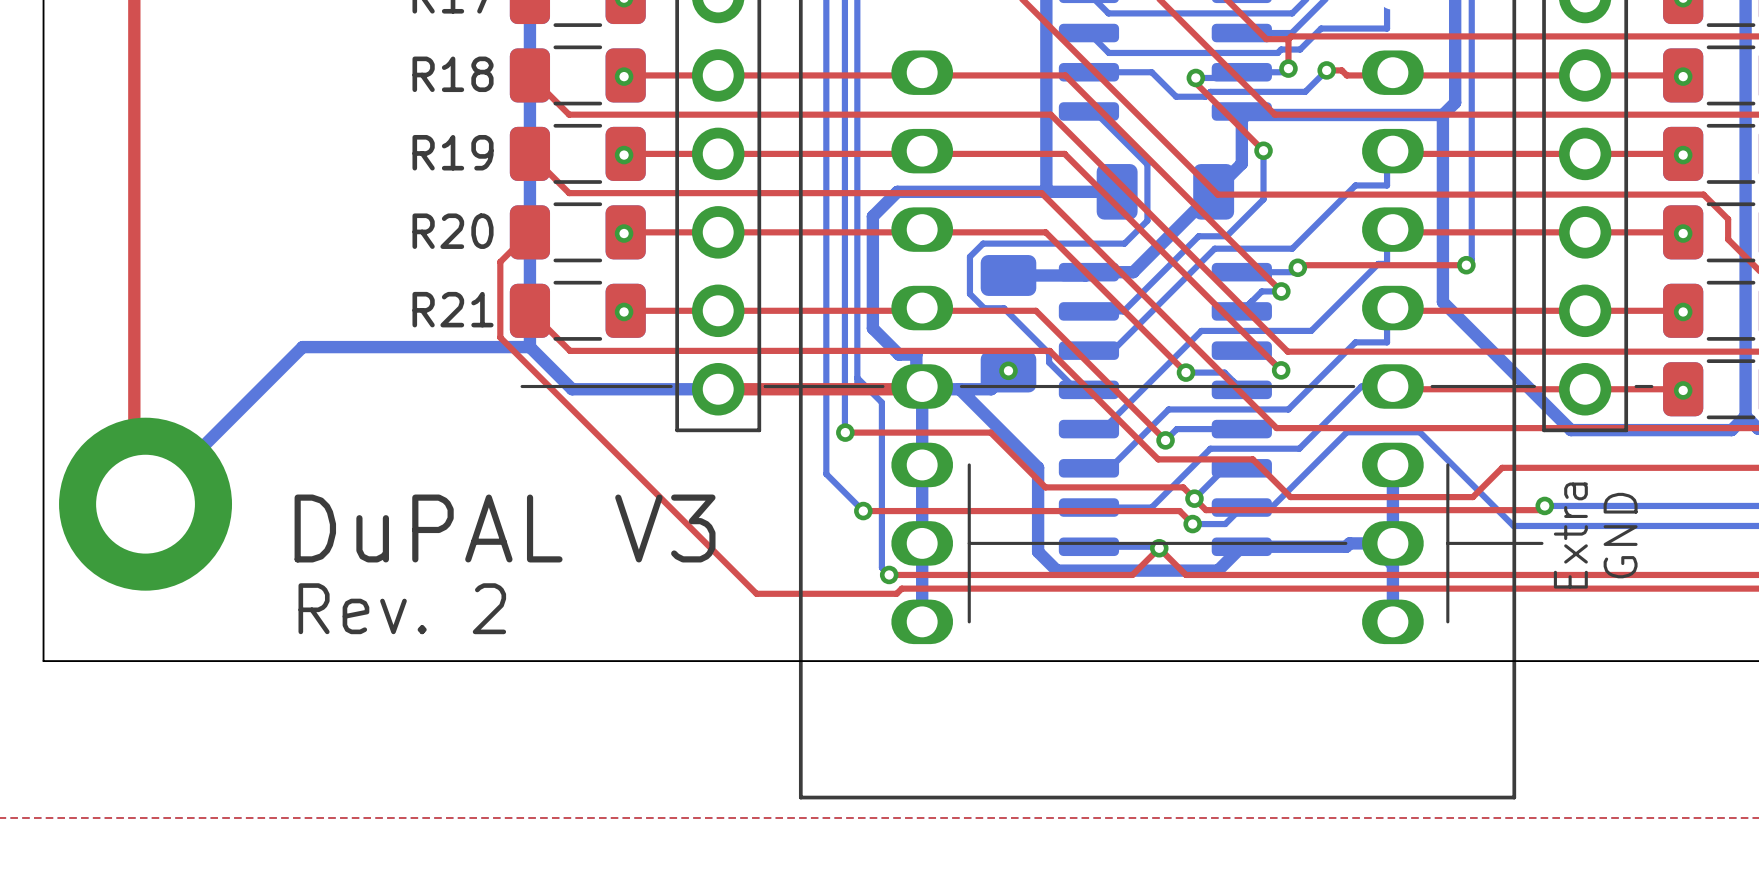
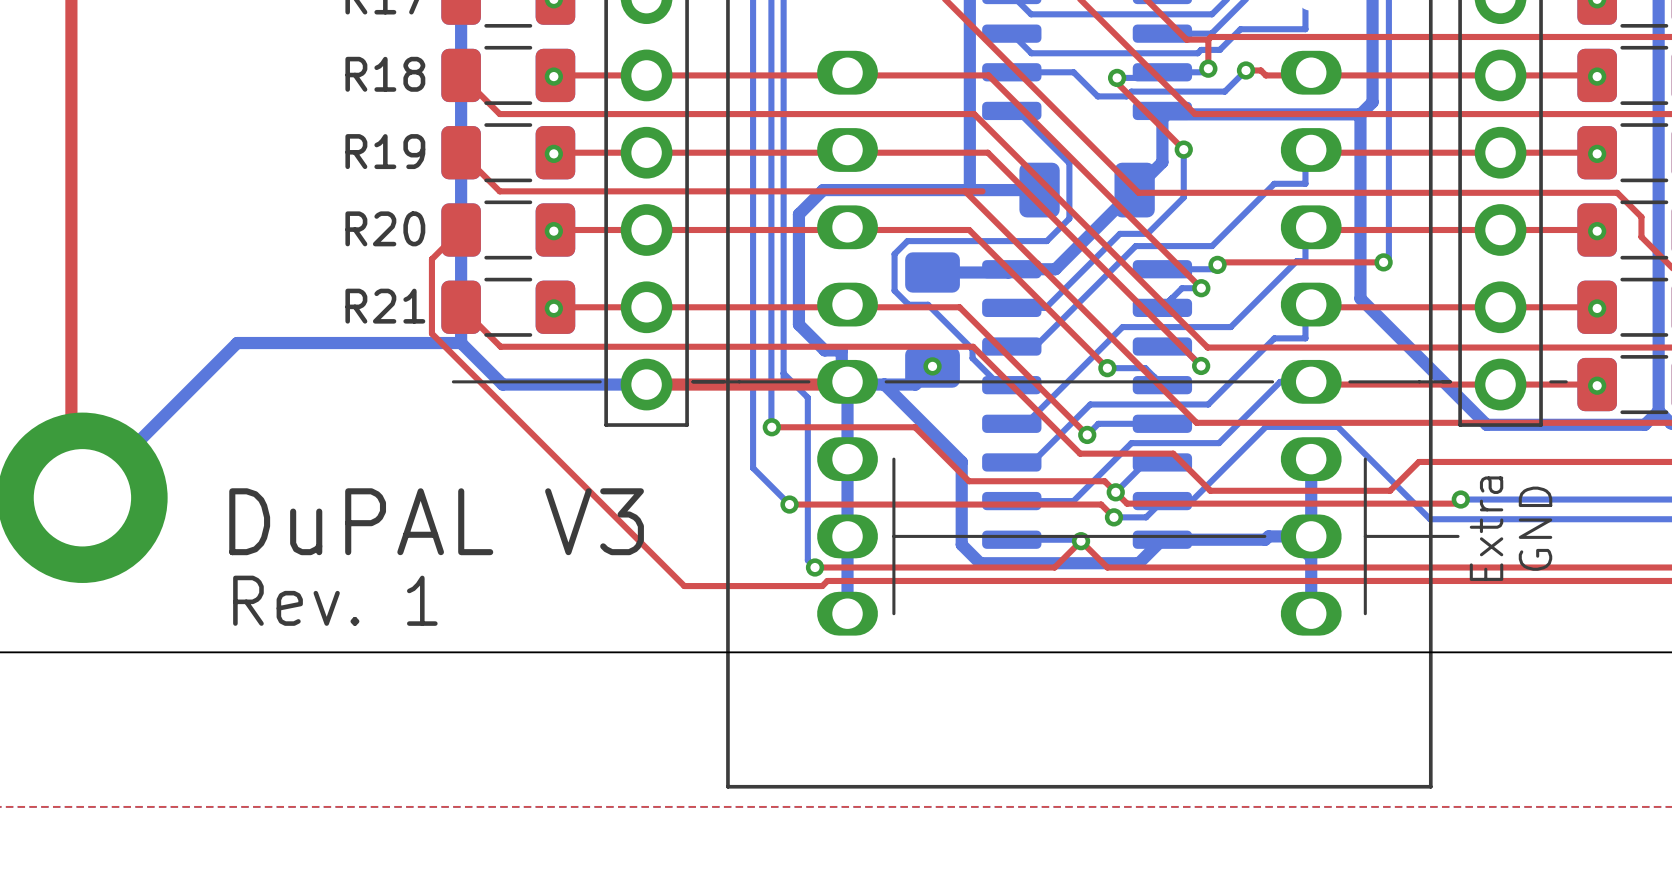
top track: none -> (965, 191) (982, 191)
text: Rev. 2 (402, 608) -> Rev. 1 (335, 600)

